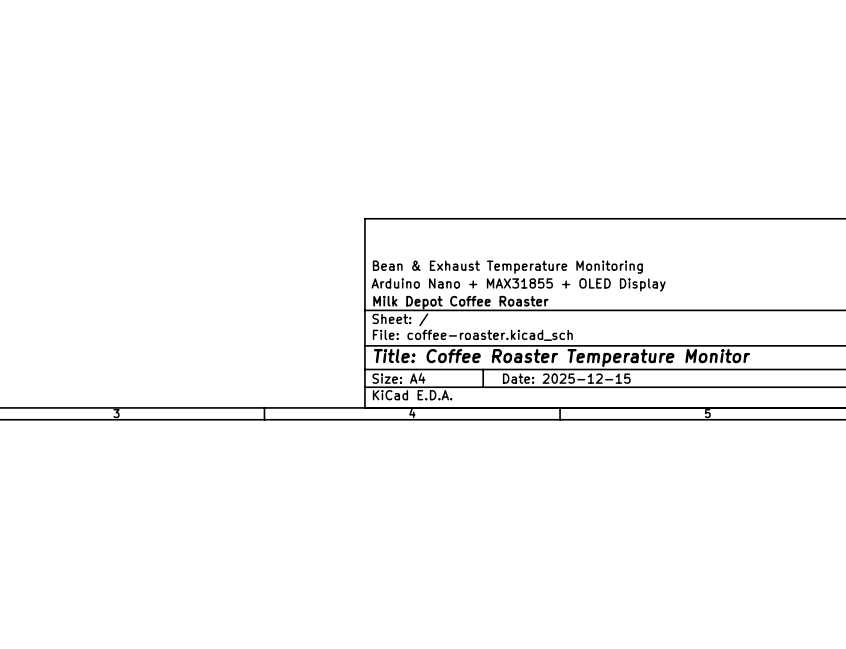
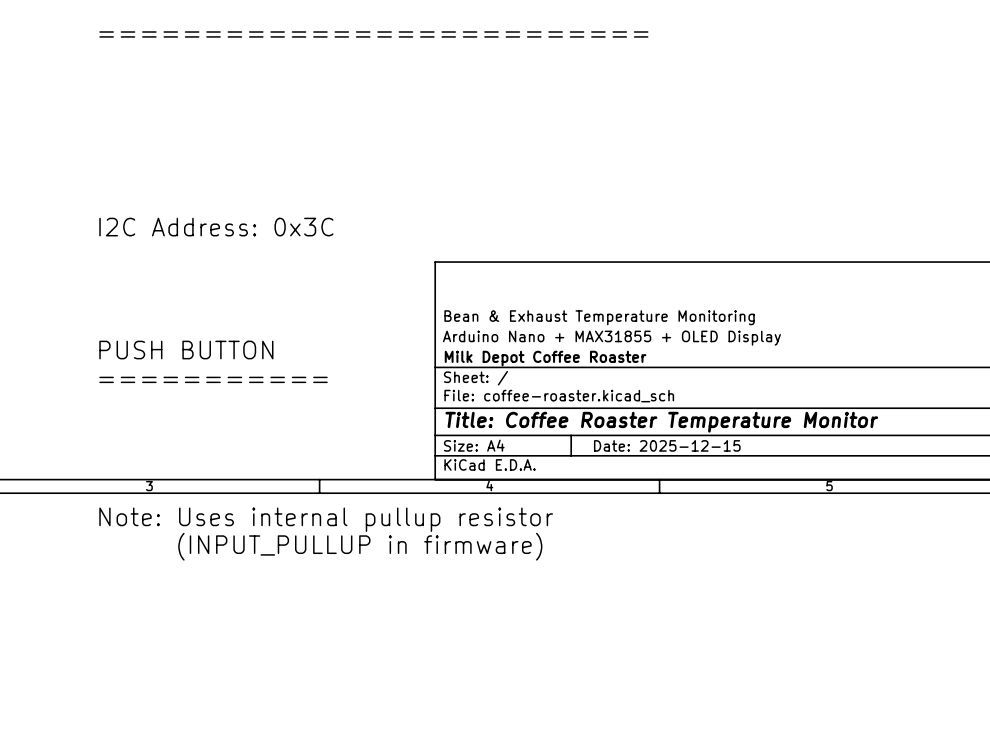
text: none -> ========================== (373, 34)
text: none -> I2C Address: 0x3C (216, 227)
text: none -> PUSH BUTTON (186, 350)
text: none -> =========== (213, 379)
text: none -> Note: Uses internal pullup resistor (326, 519)
text: none -> (INPUT_PULLUP in firmware) (360, 546)

